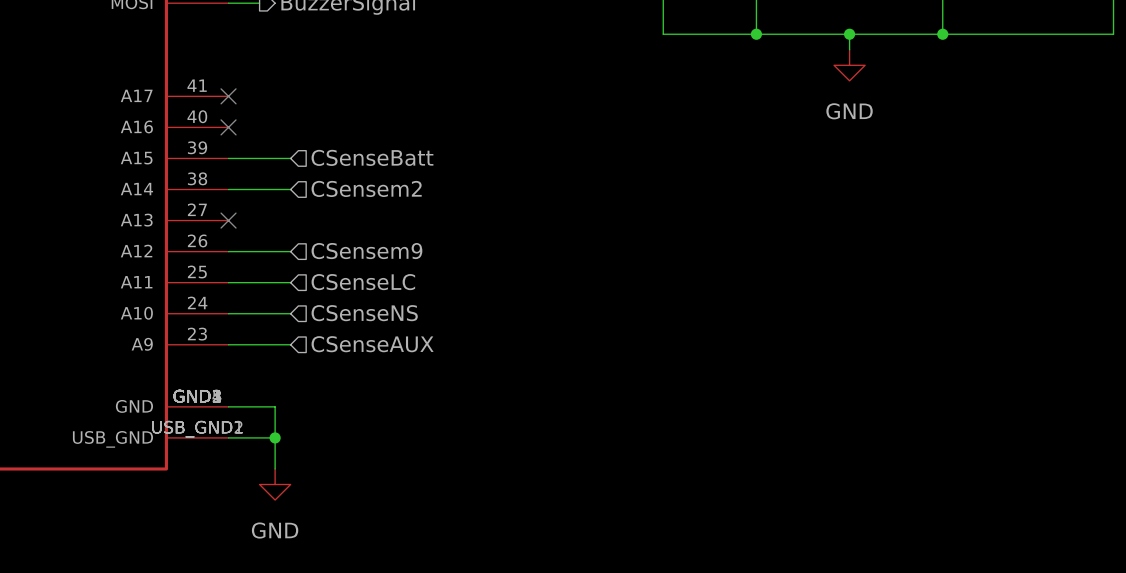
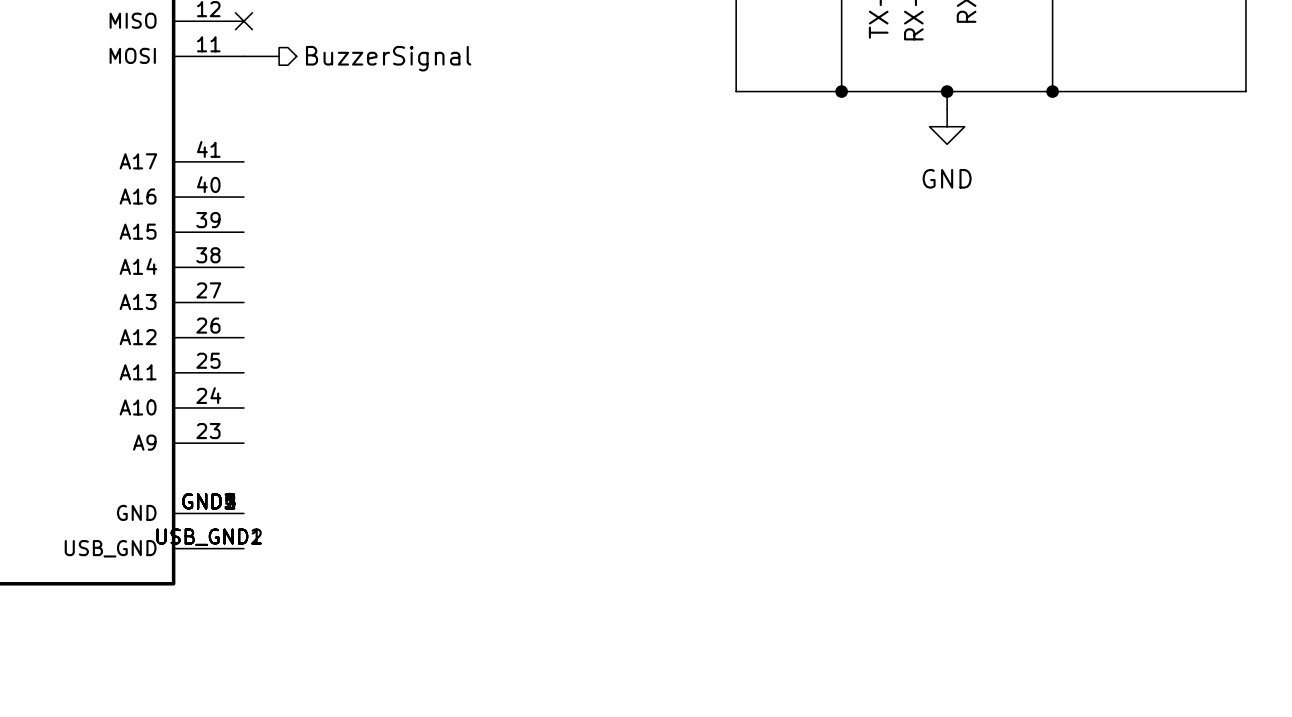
no-connect mark: (228, 96) -> none
no-connect mark: (228, 127) -> none
hierarchical label: CSenseBatt (372, 157) -> none
wire: (228, 158) (290, 158) -> none
hierarchical label: CSensem2 (366, 188) -> none
wire: (228, 189) (290, 189) -> none
no-connect mark: (228, 220) -> none
wire: (228, 251) (290, 251) -> none
hierarchical label: CSensem9 (366, 251) -> none
wire: (228, 282) (290, 282) -> none
hierarchical label: CSenseLC (363, 282) -> none
wire: (228, 313) (290, 313) -> none
hierarchical label: CSenseNS (364, 313) -> none
wire: (228, 344) (290, 344) -> none
hierarchical label: CSenseAUX (372, 344) -> none
wire: (228, 406) (275, 406) (275, 468) -> none
wire: (228, 437) (275, 437) -> none
junction: (275, 437) -> none
power symbol: GND (275, 484) -> none

